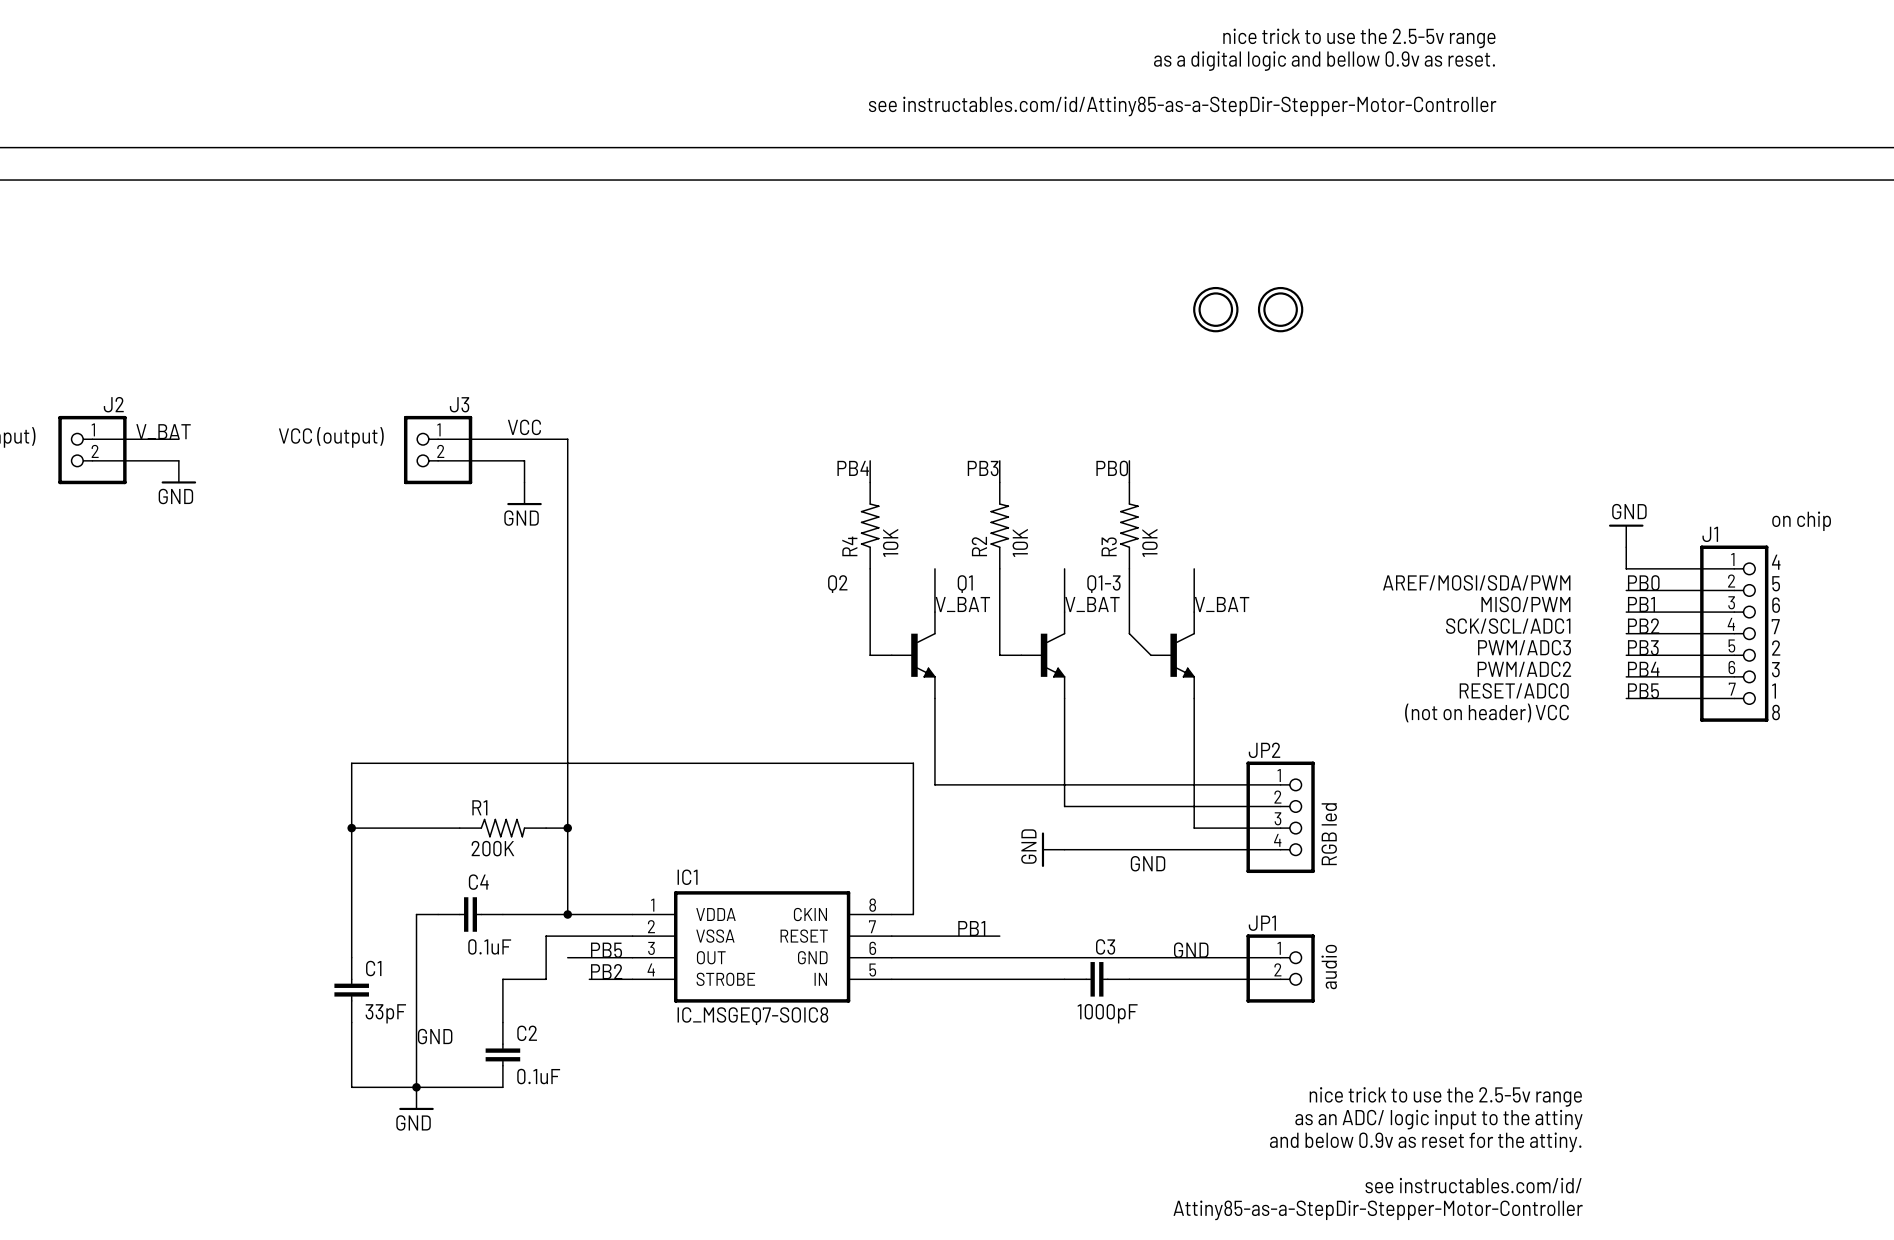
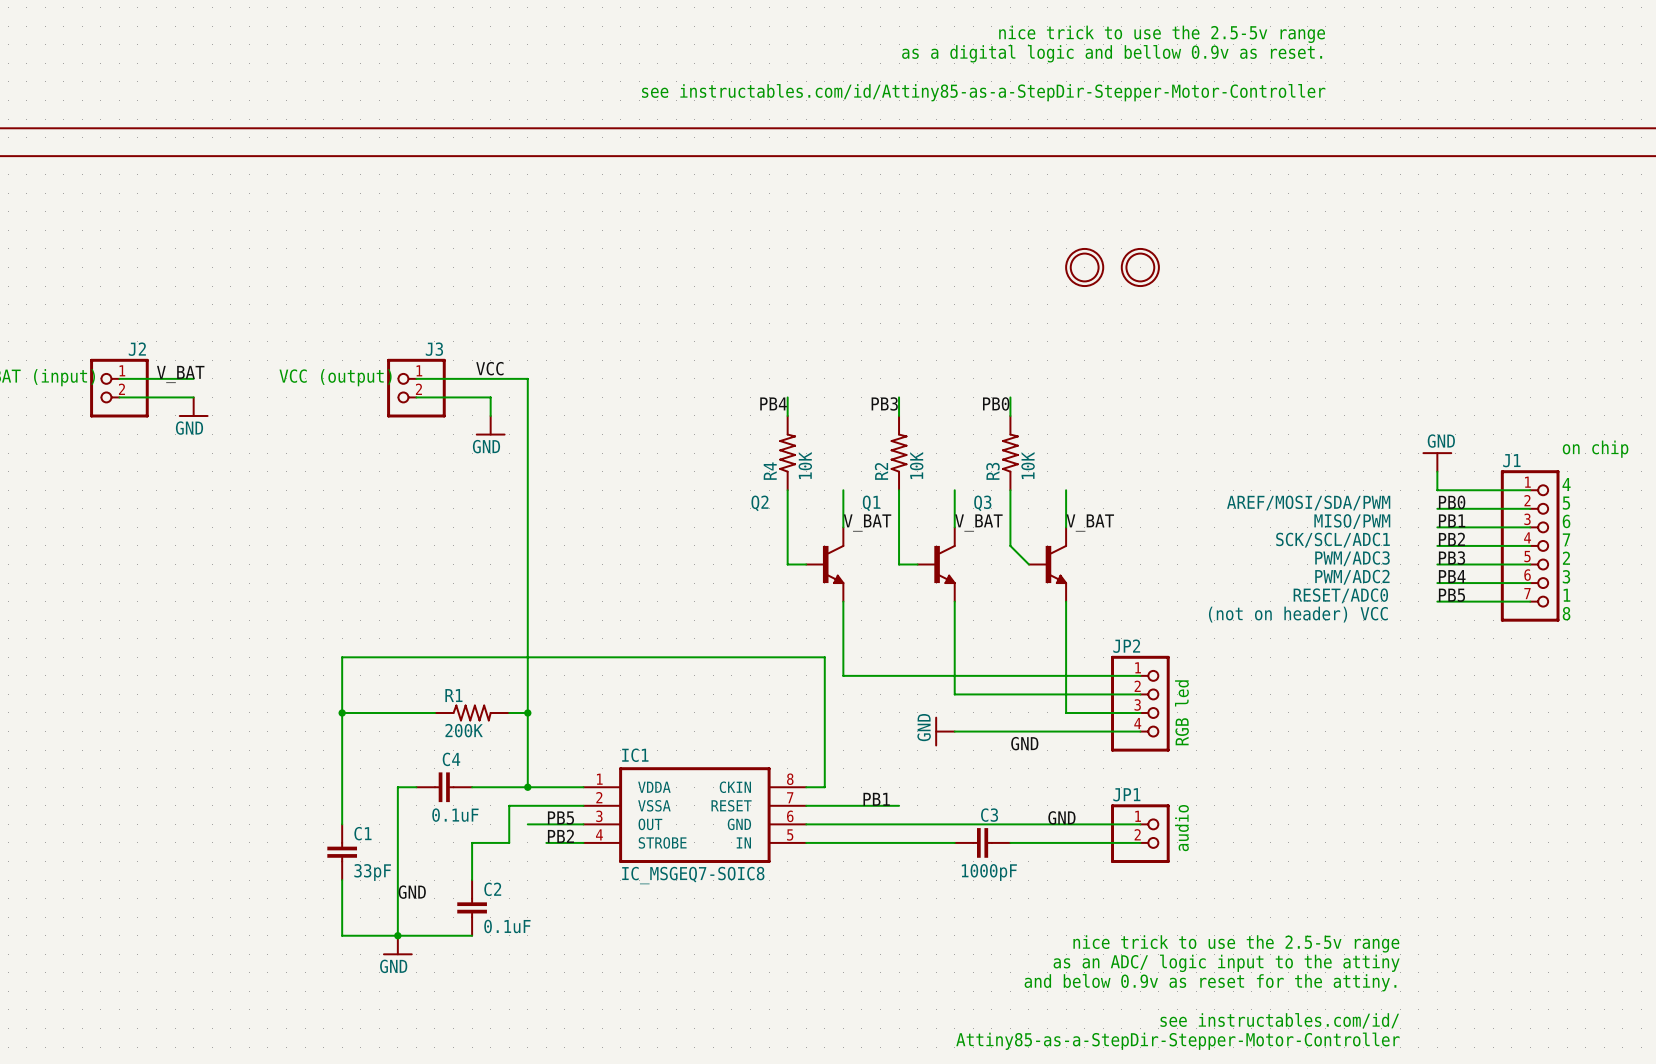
Q1-3 name: Q1-3 (1103, 584) -> Q3 (982, 503)

